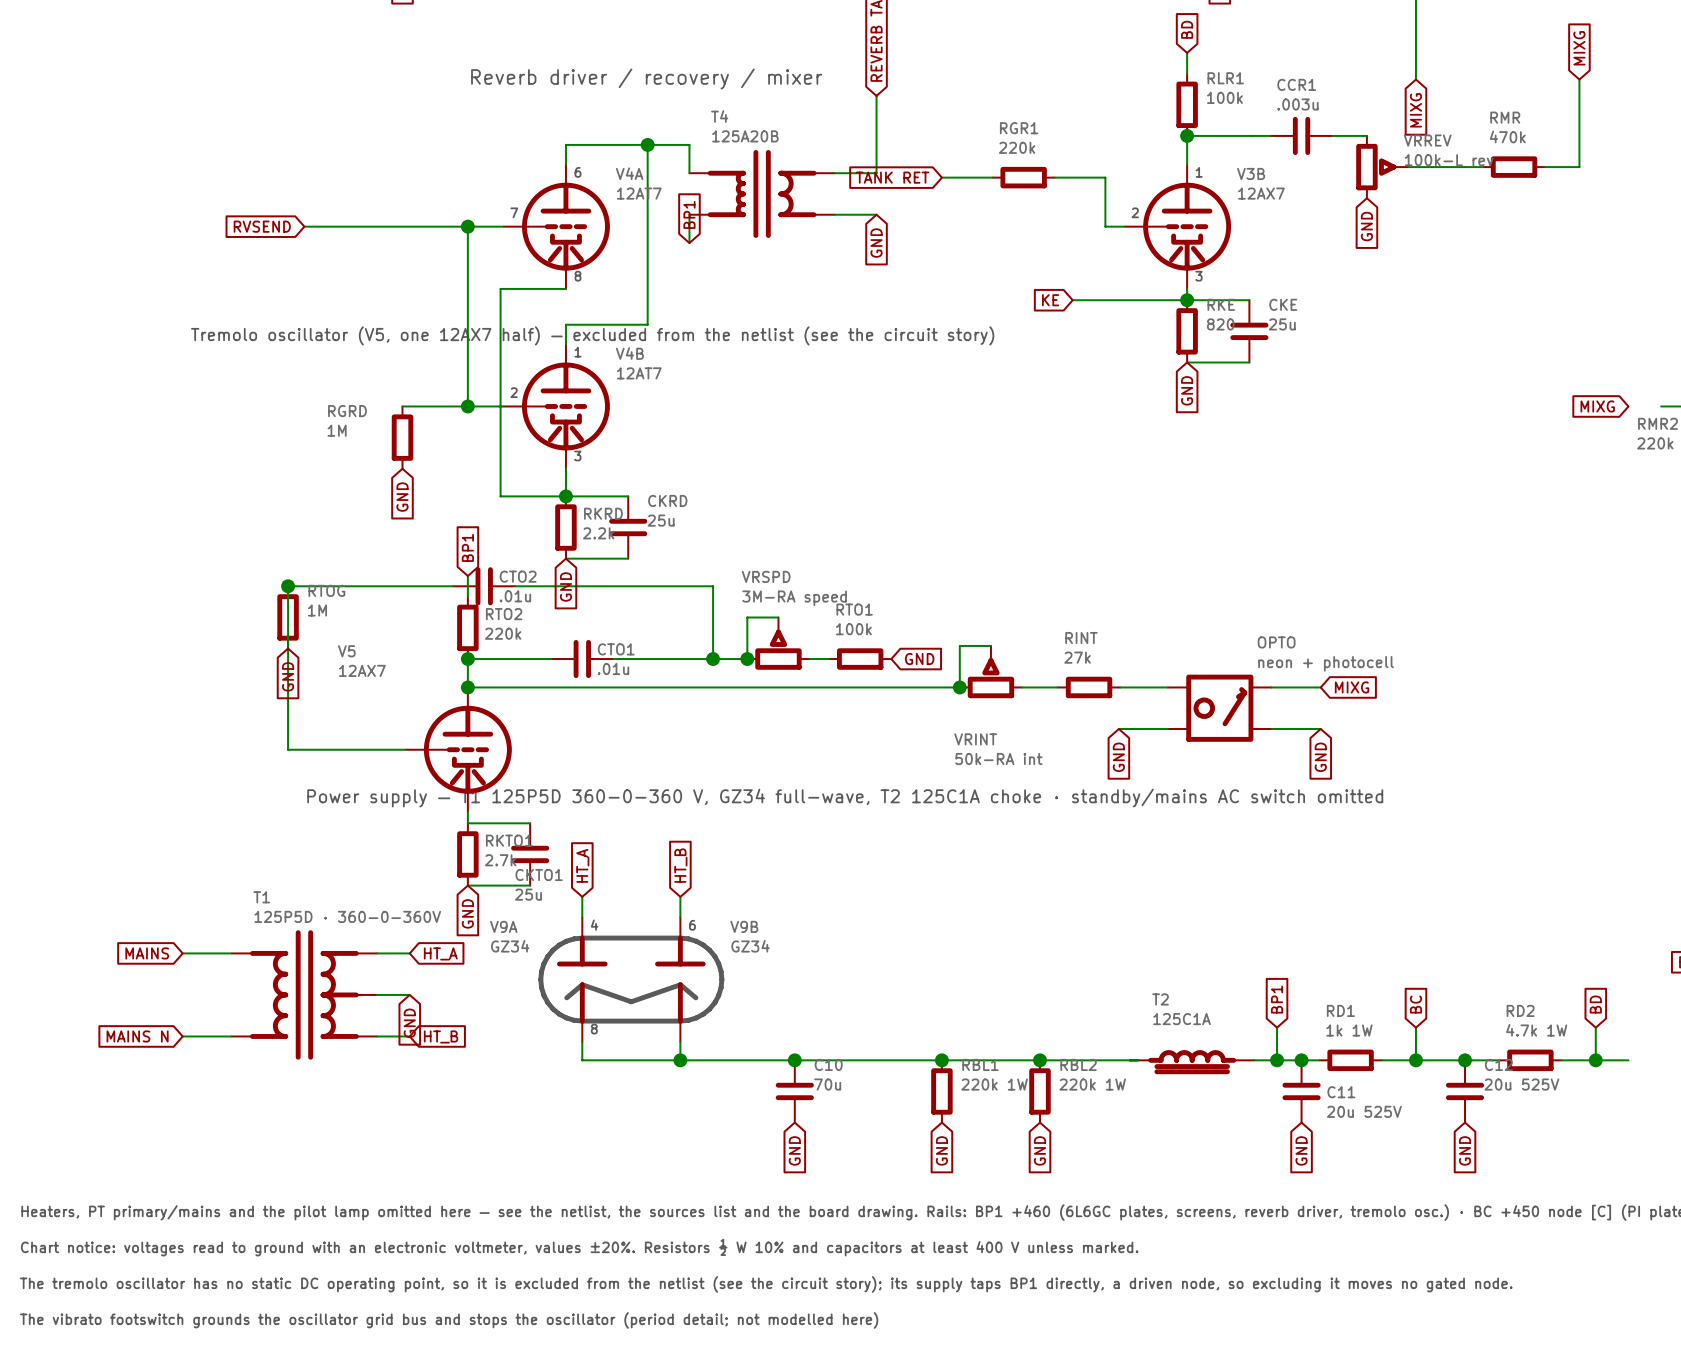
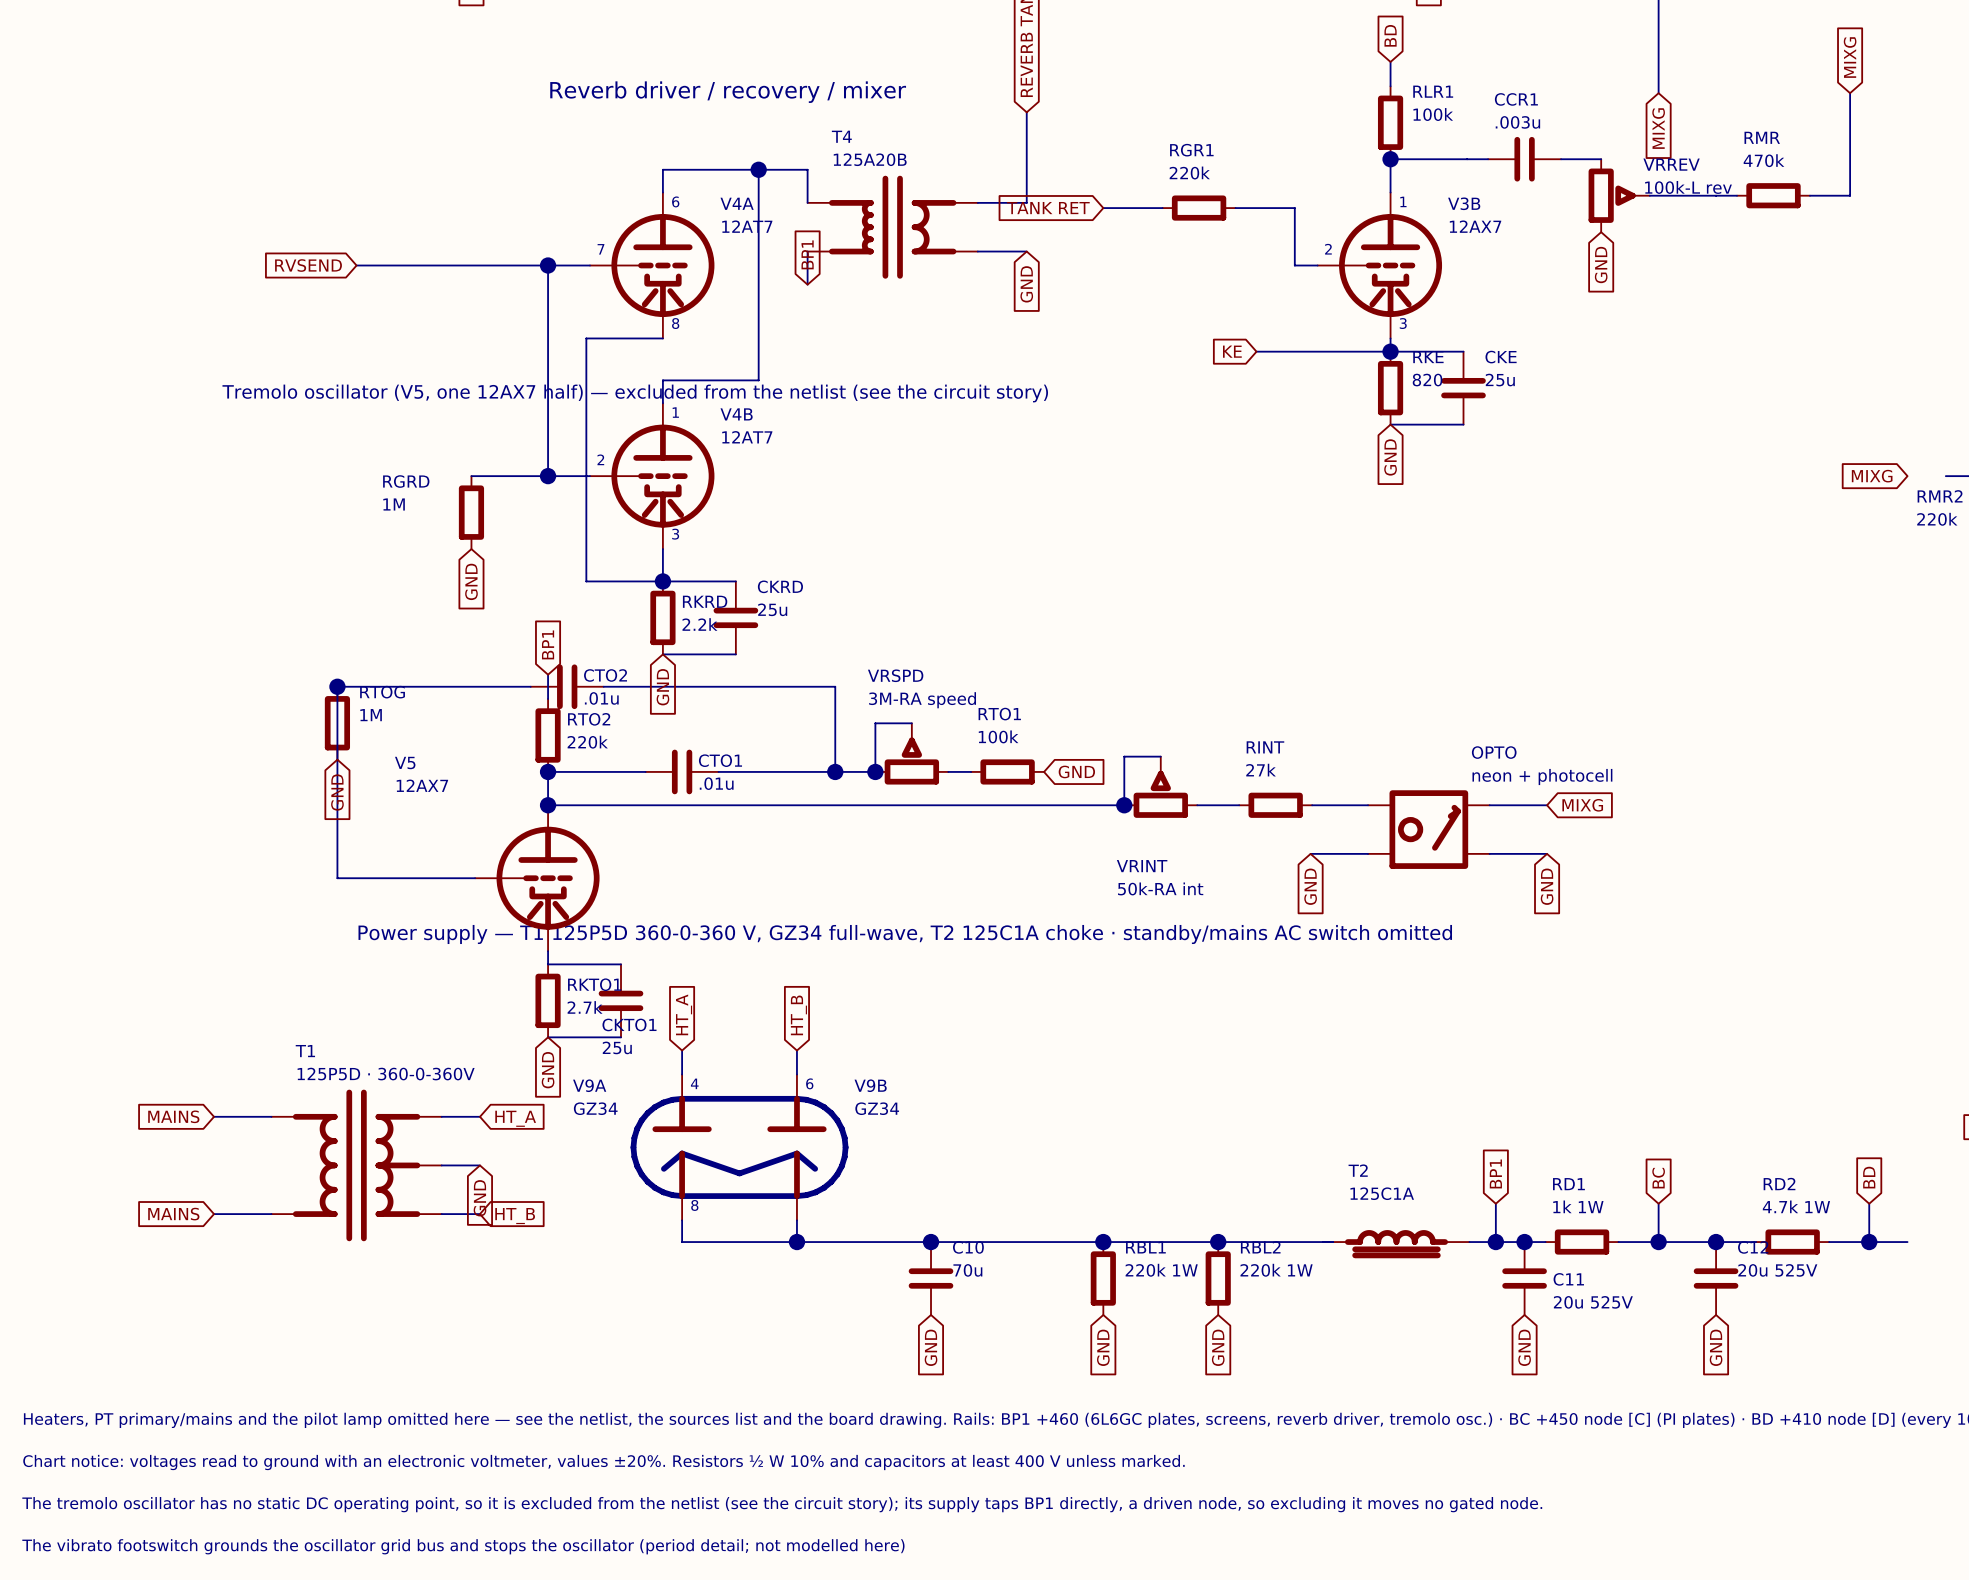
global label: MAINS N (137, 1036) -> MAINS (173, 1214)

